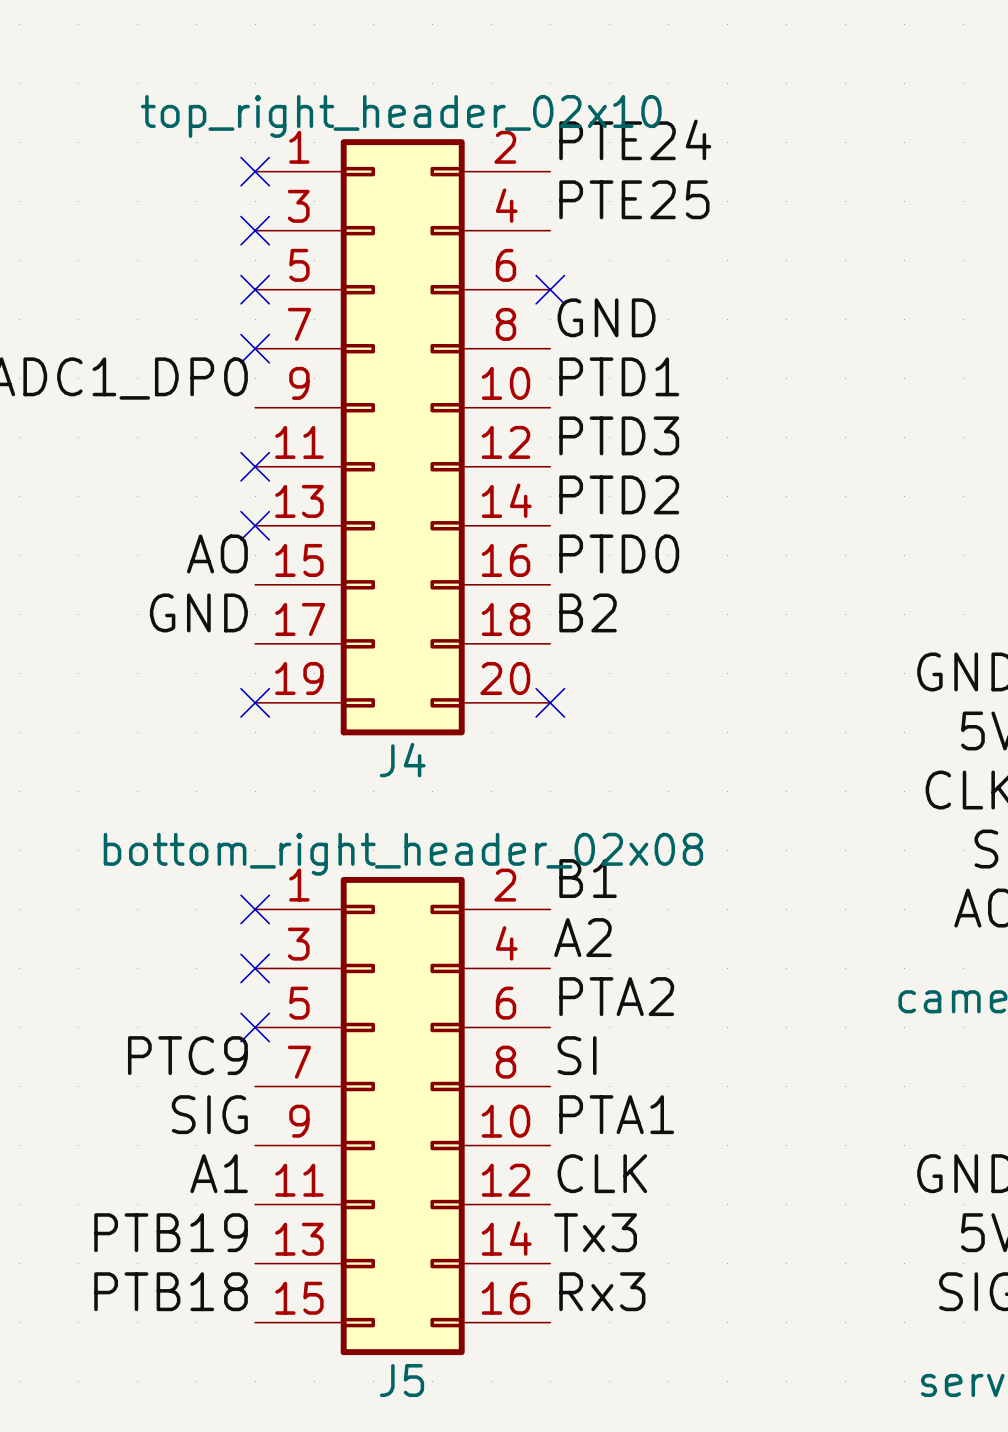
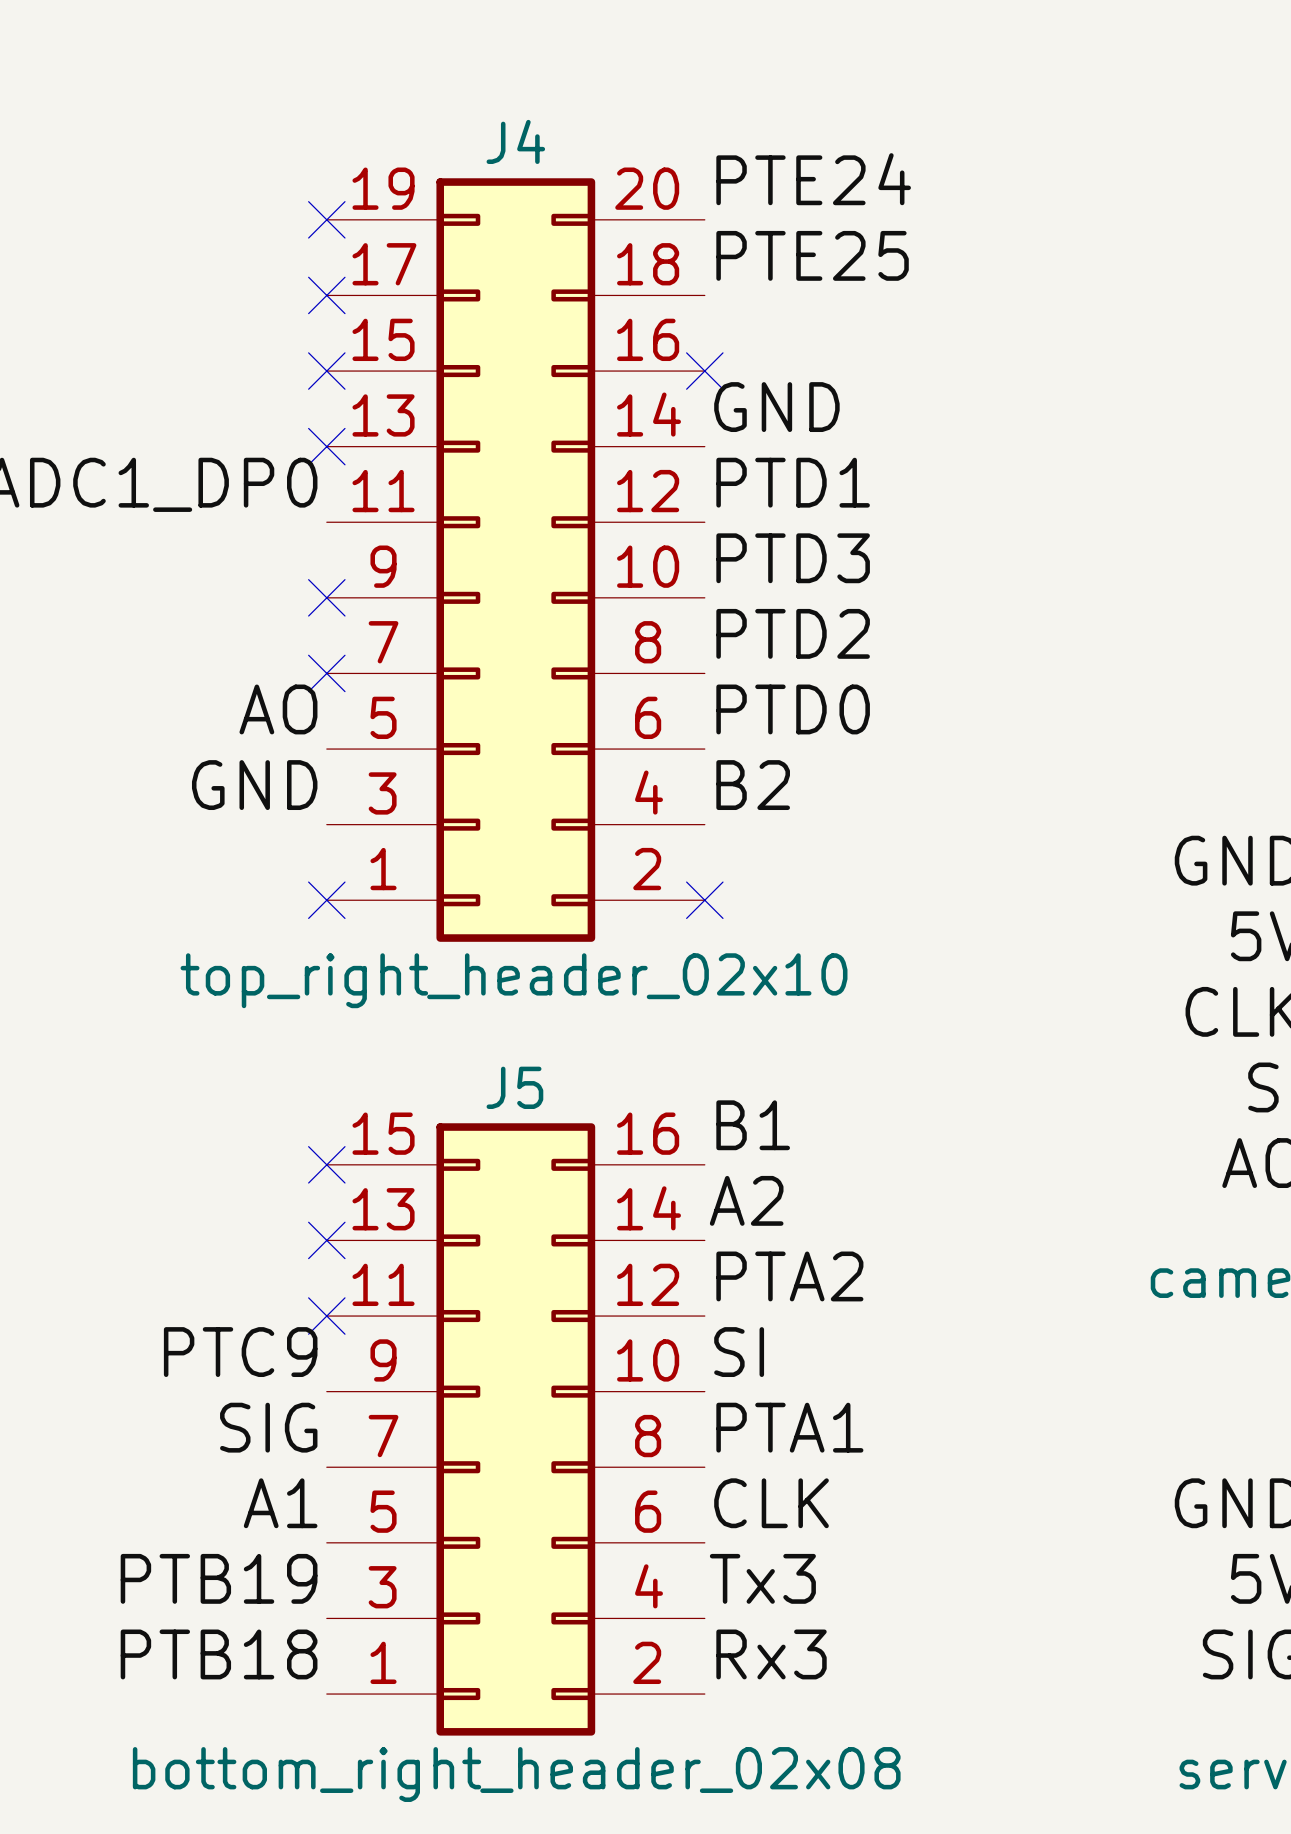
J4 flip: as is (402, 437) -> up-down (515, 560)
J5 flip: as is (402, 1116) -> up-down (515, 1429)

